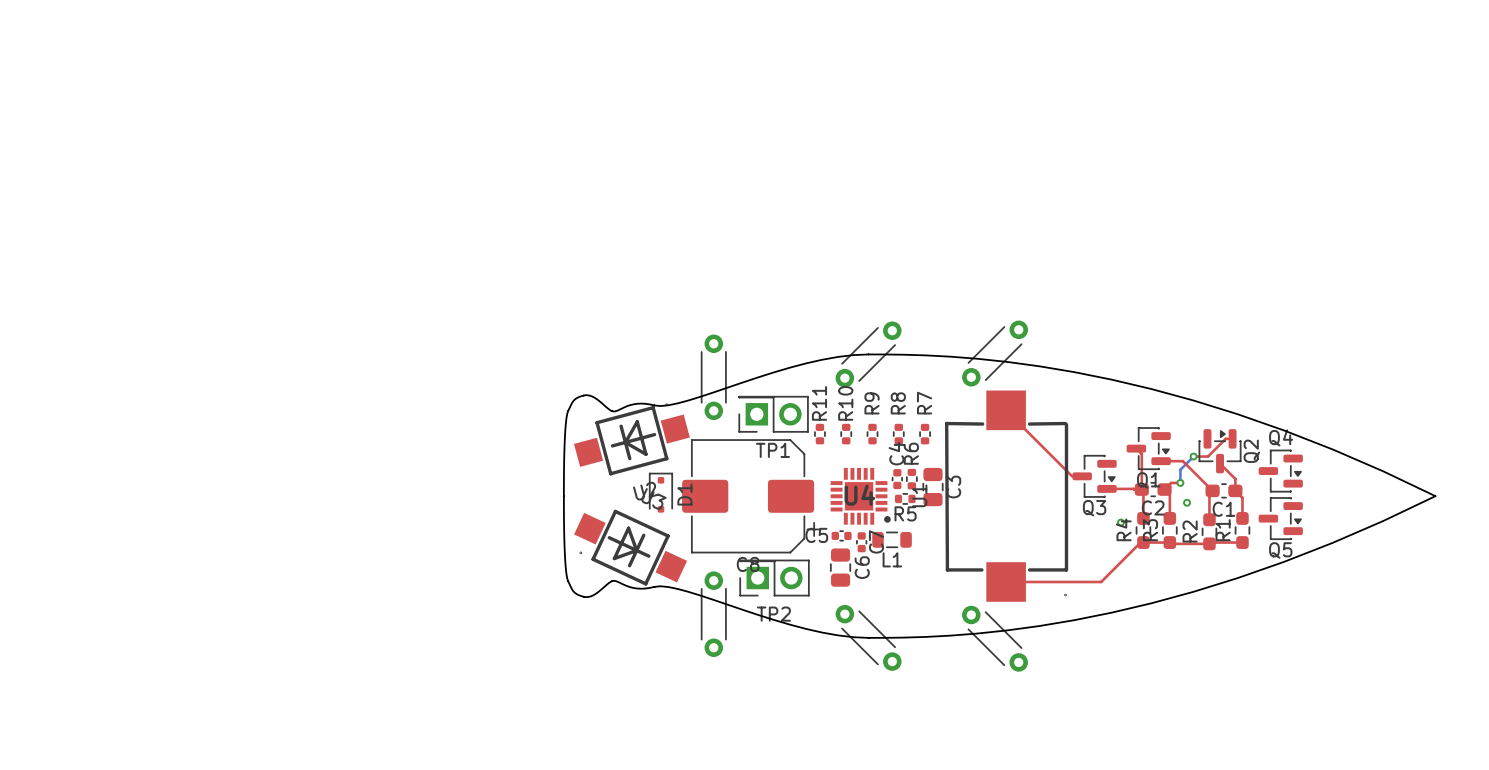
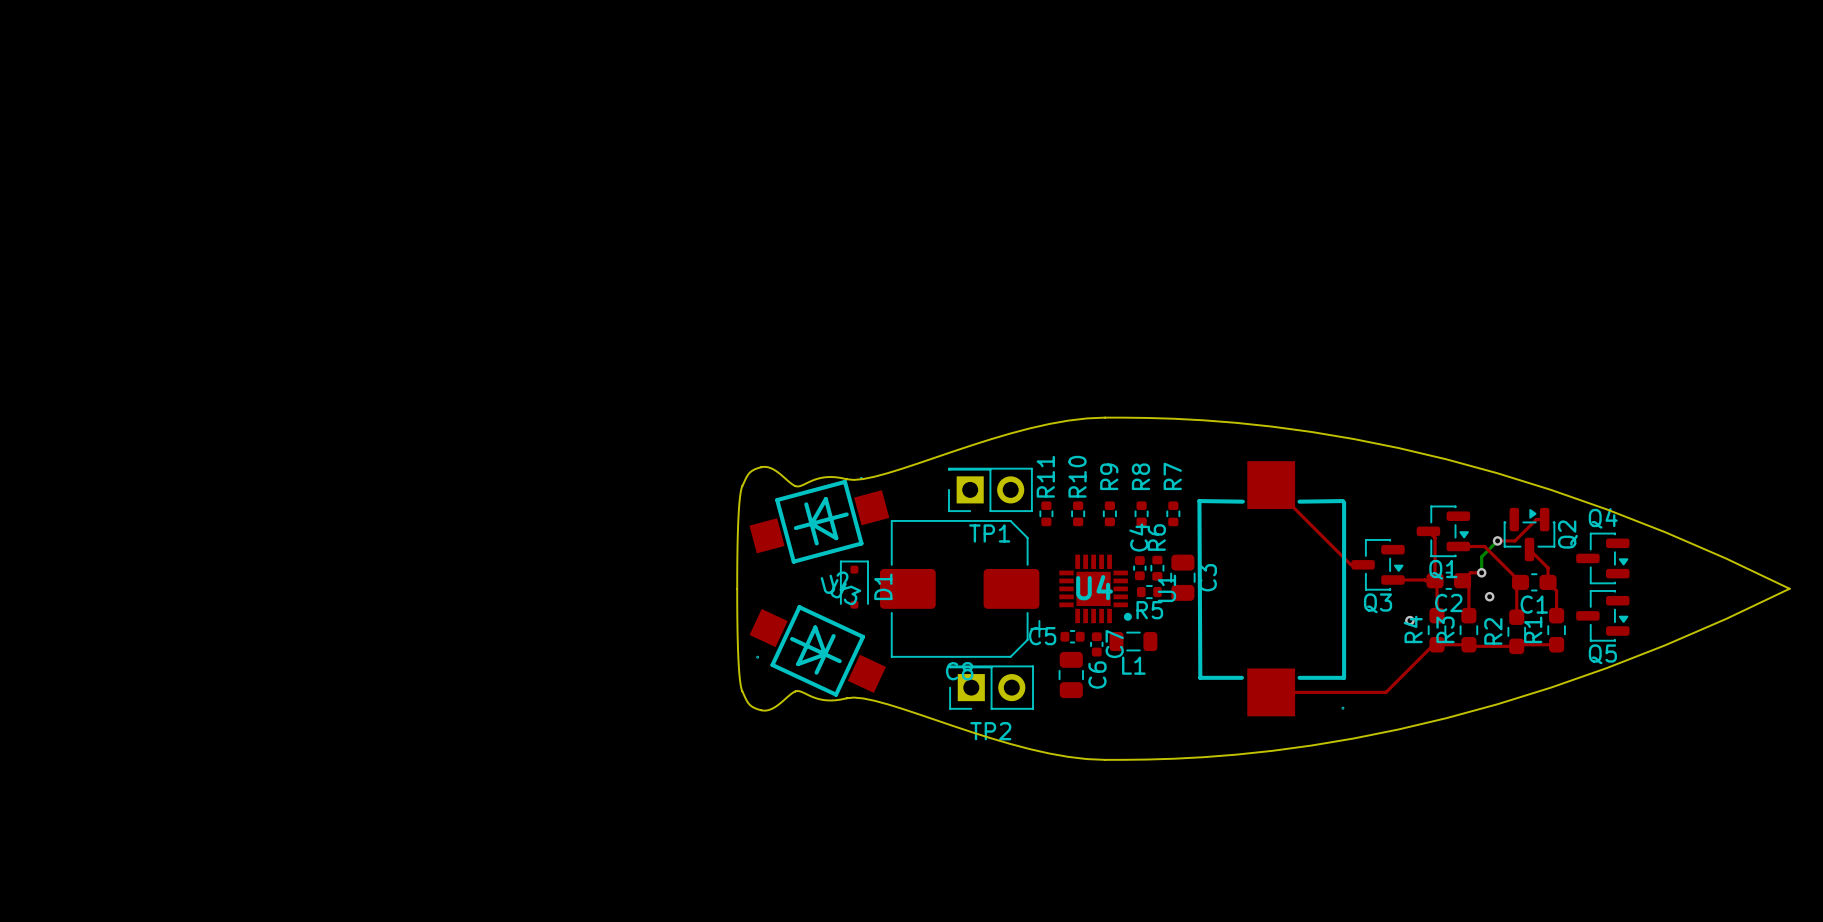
part: (995, 353) -> none
part: (868, 354) -> none
part: (713, 377) -> none
part: (713, 614) -> none
part: (868, 637) -> none
part: (995, 638) -> none

